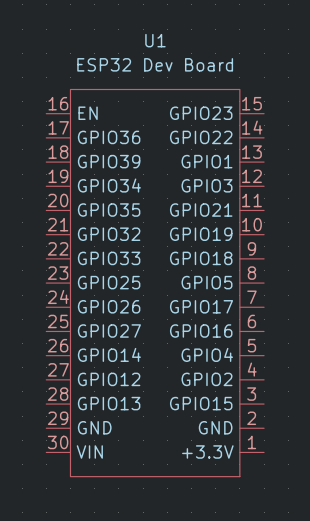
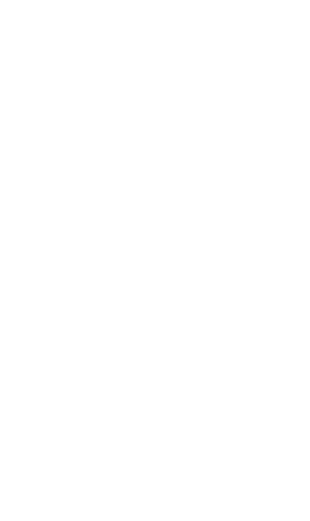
U1: ESP32 Dev Board (155, 283) -> none

